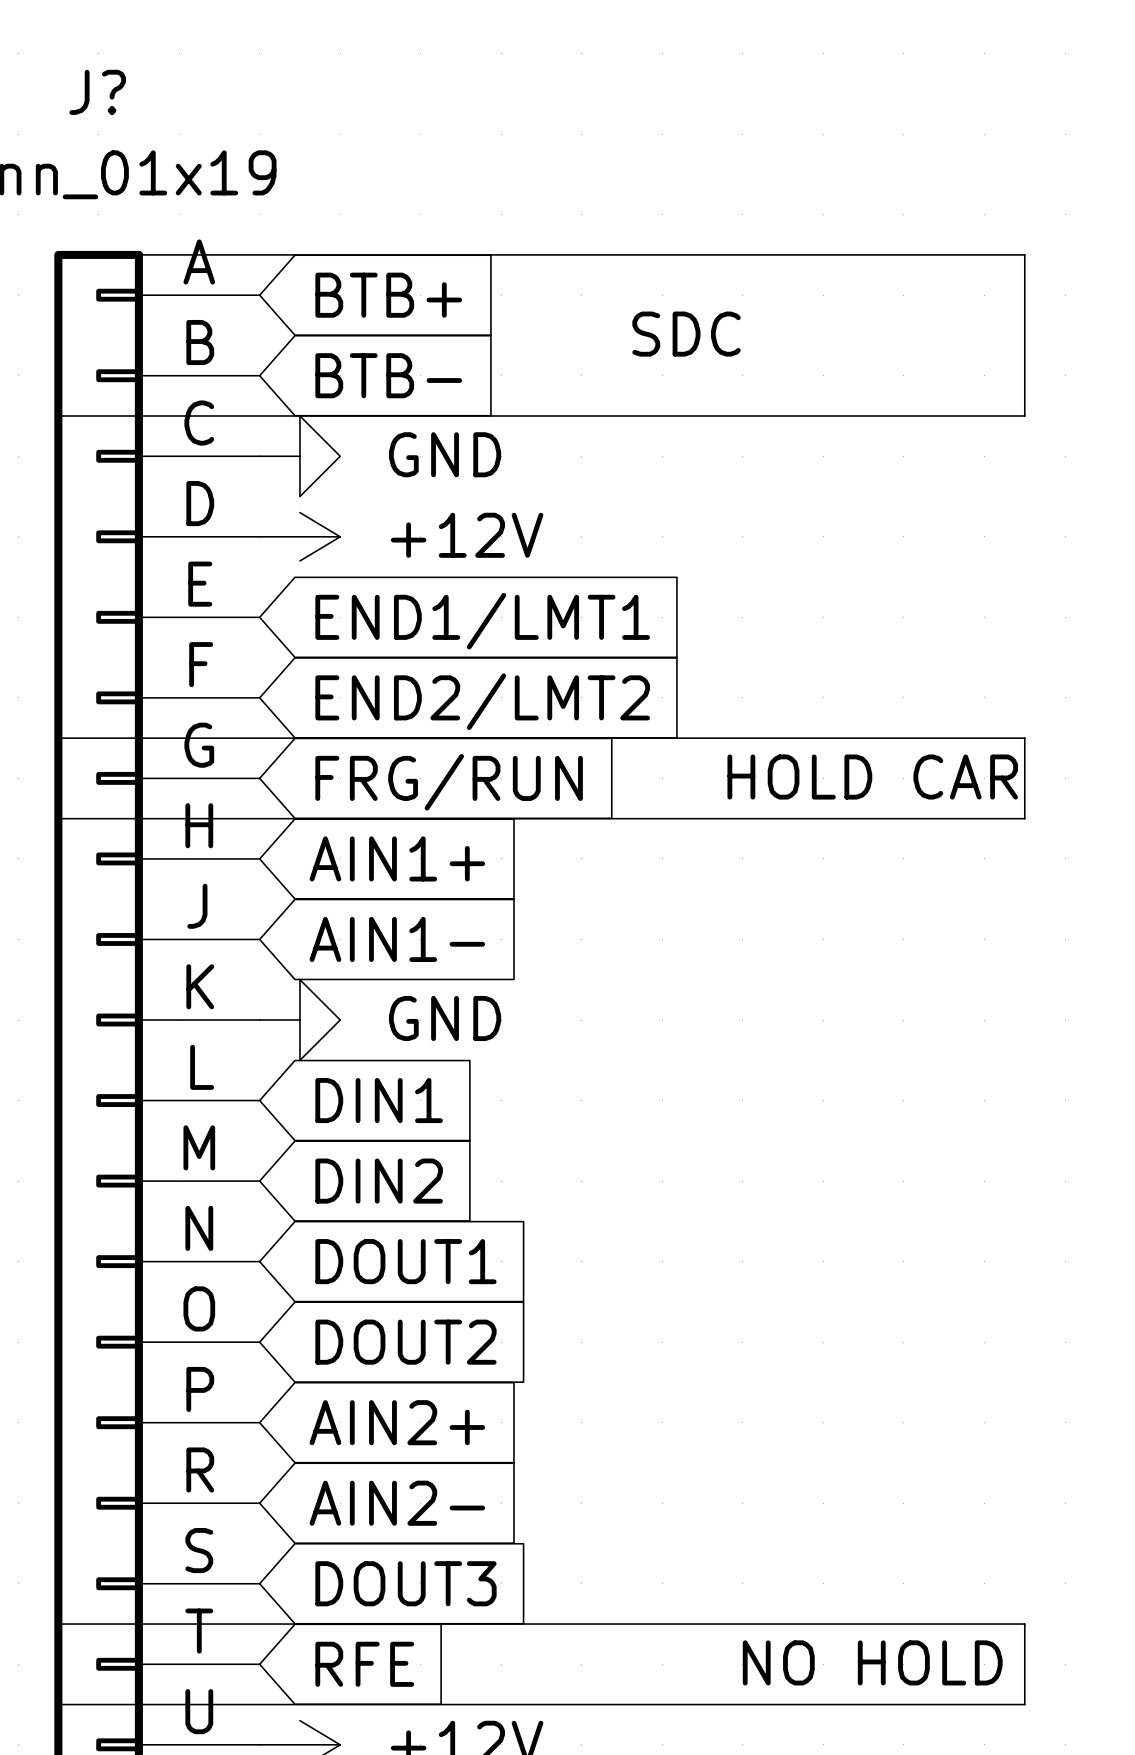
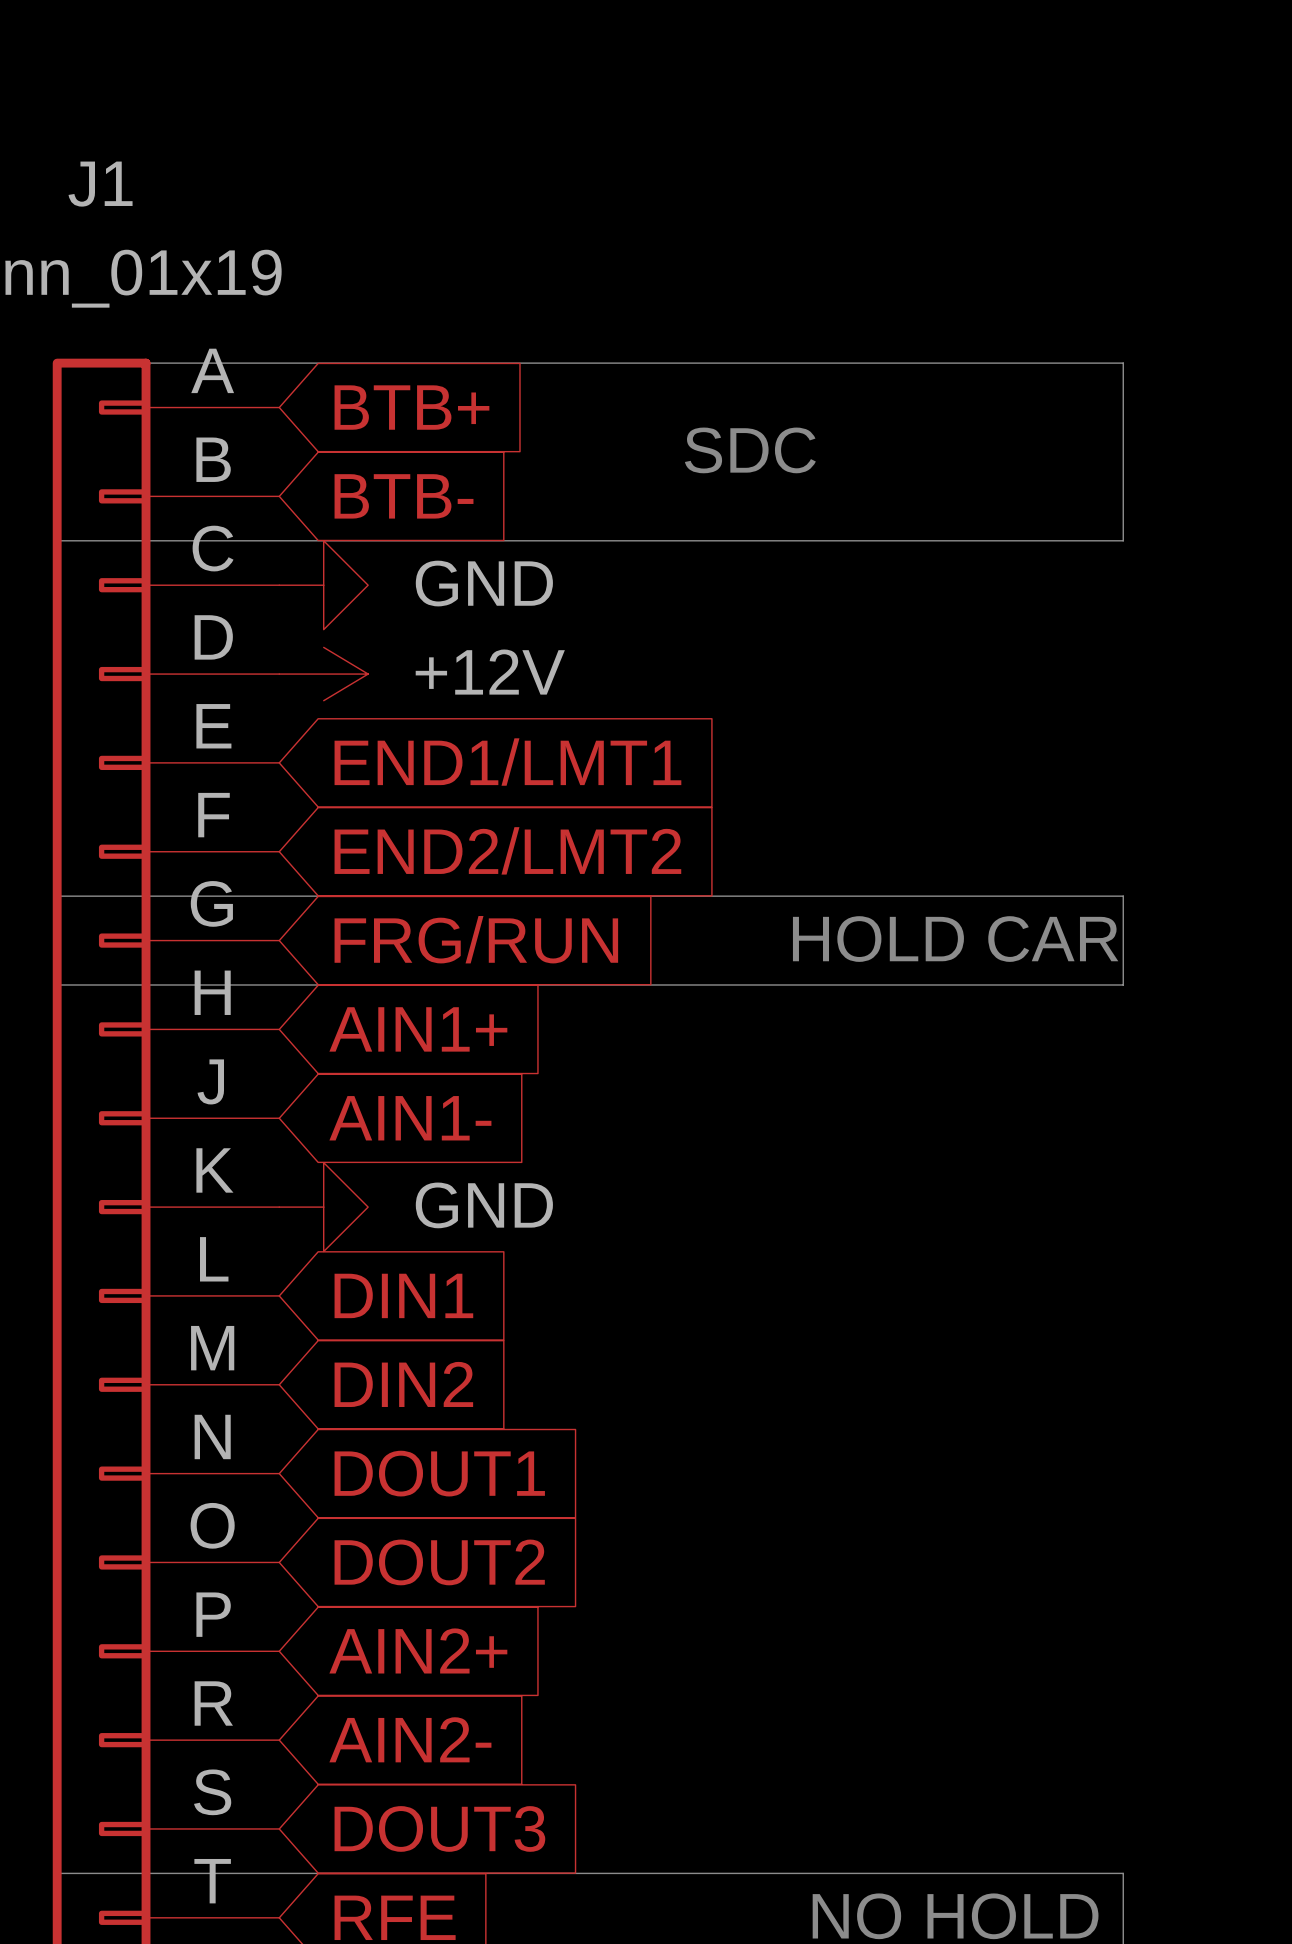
J? name: J? (97, 92) -> J1 (100, 184)

